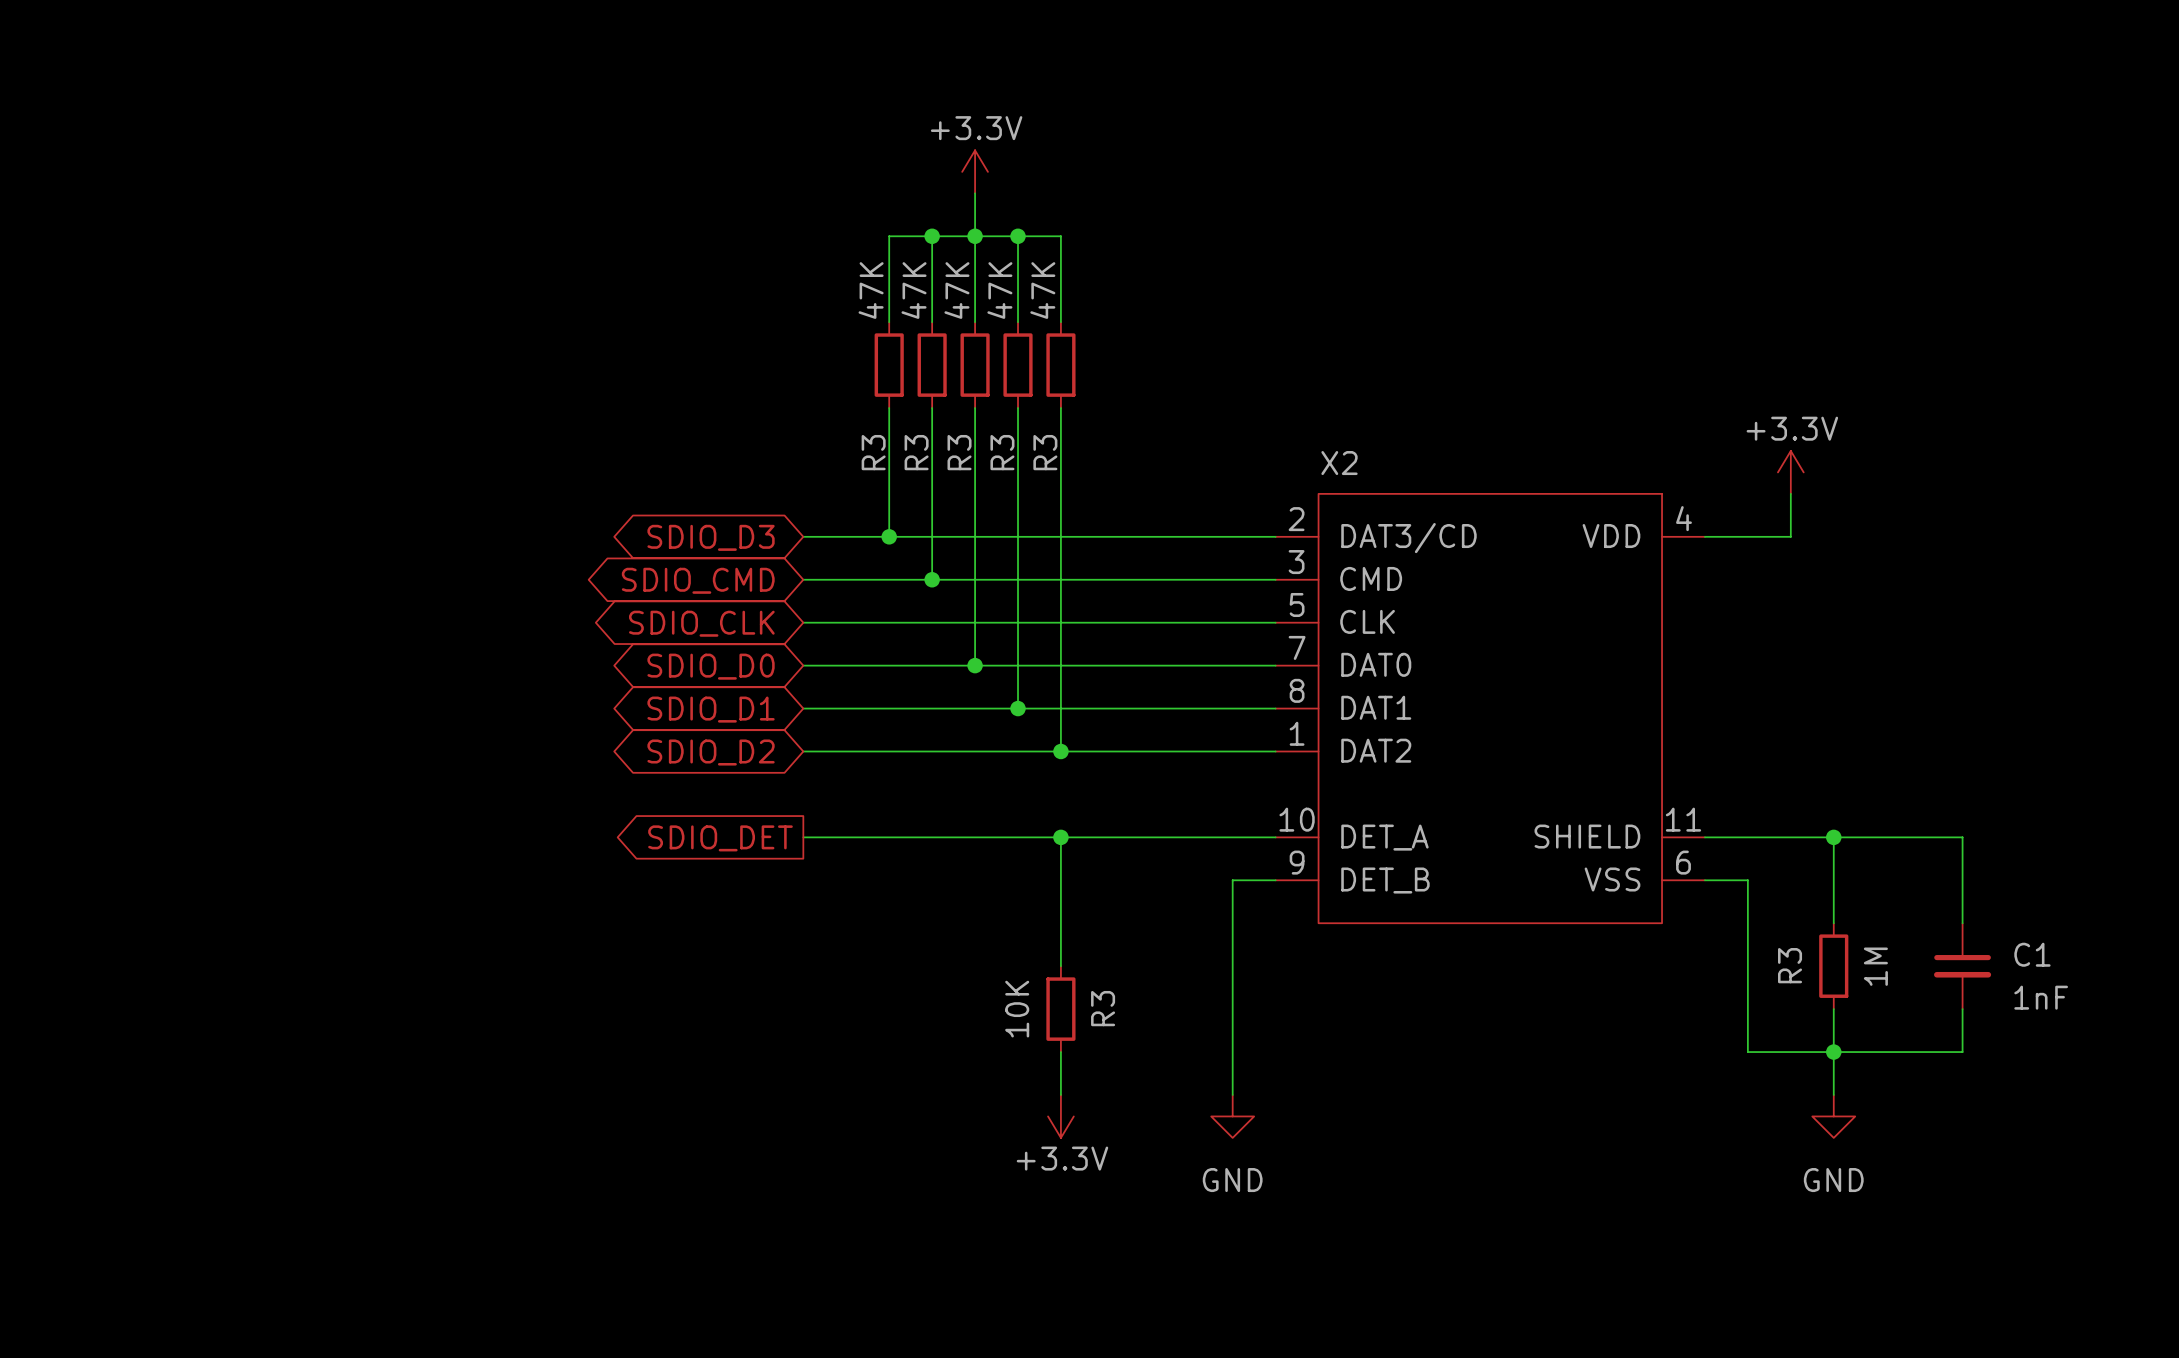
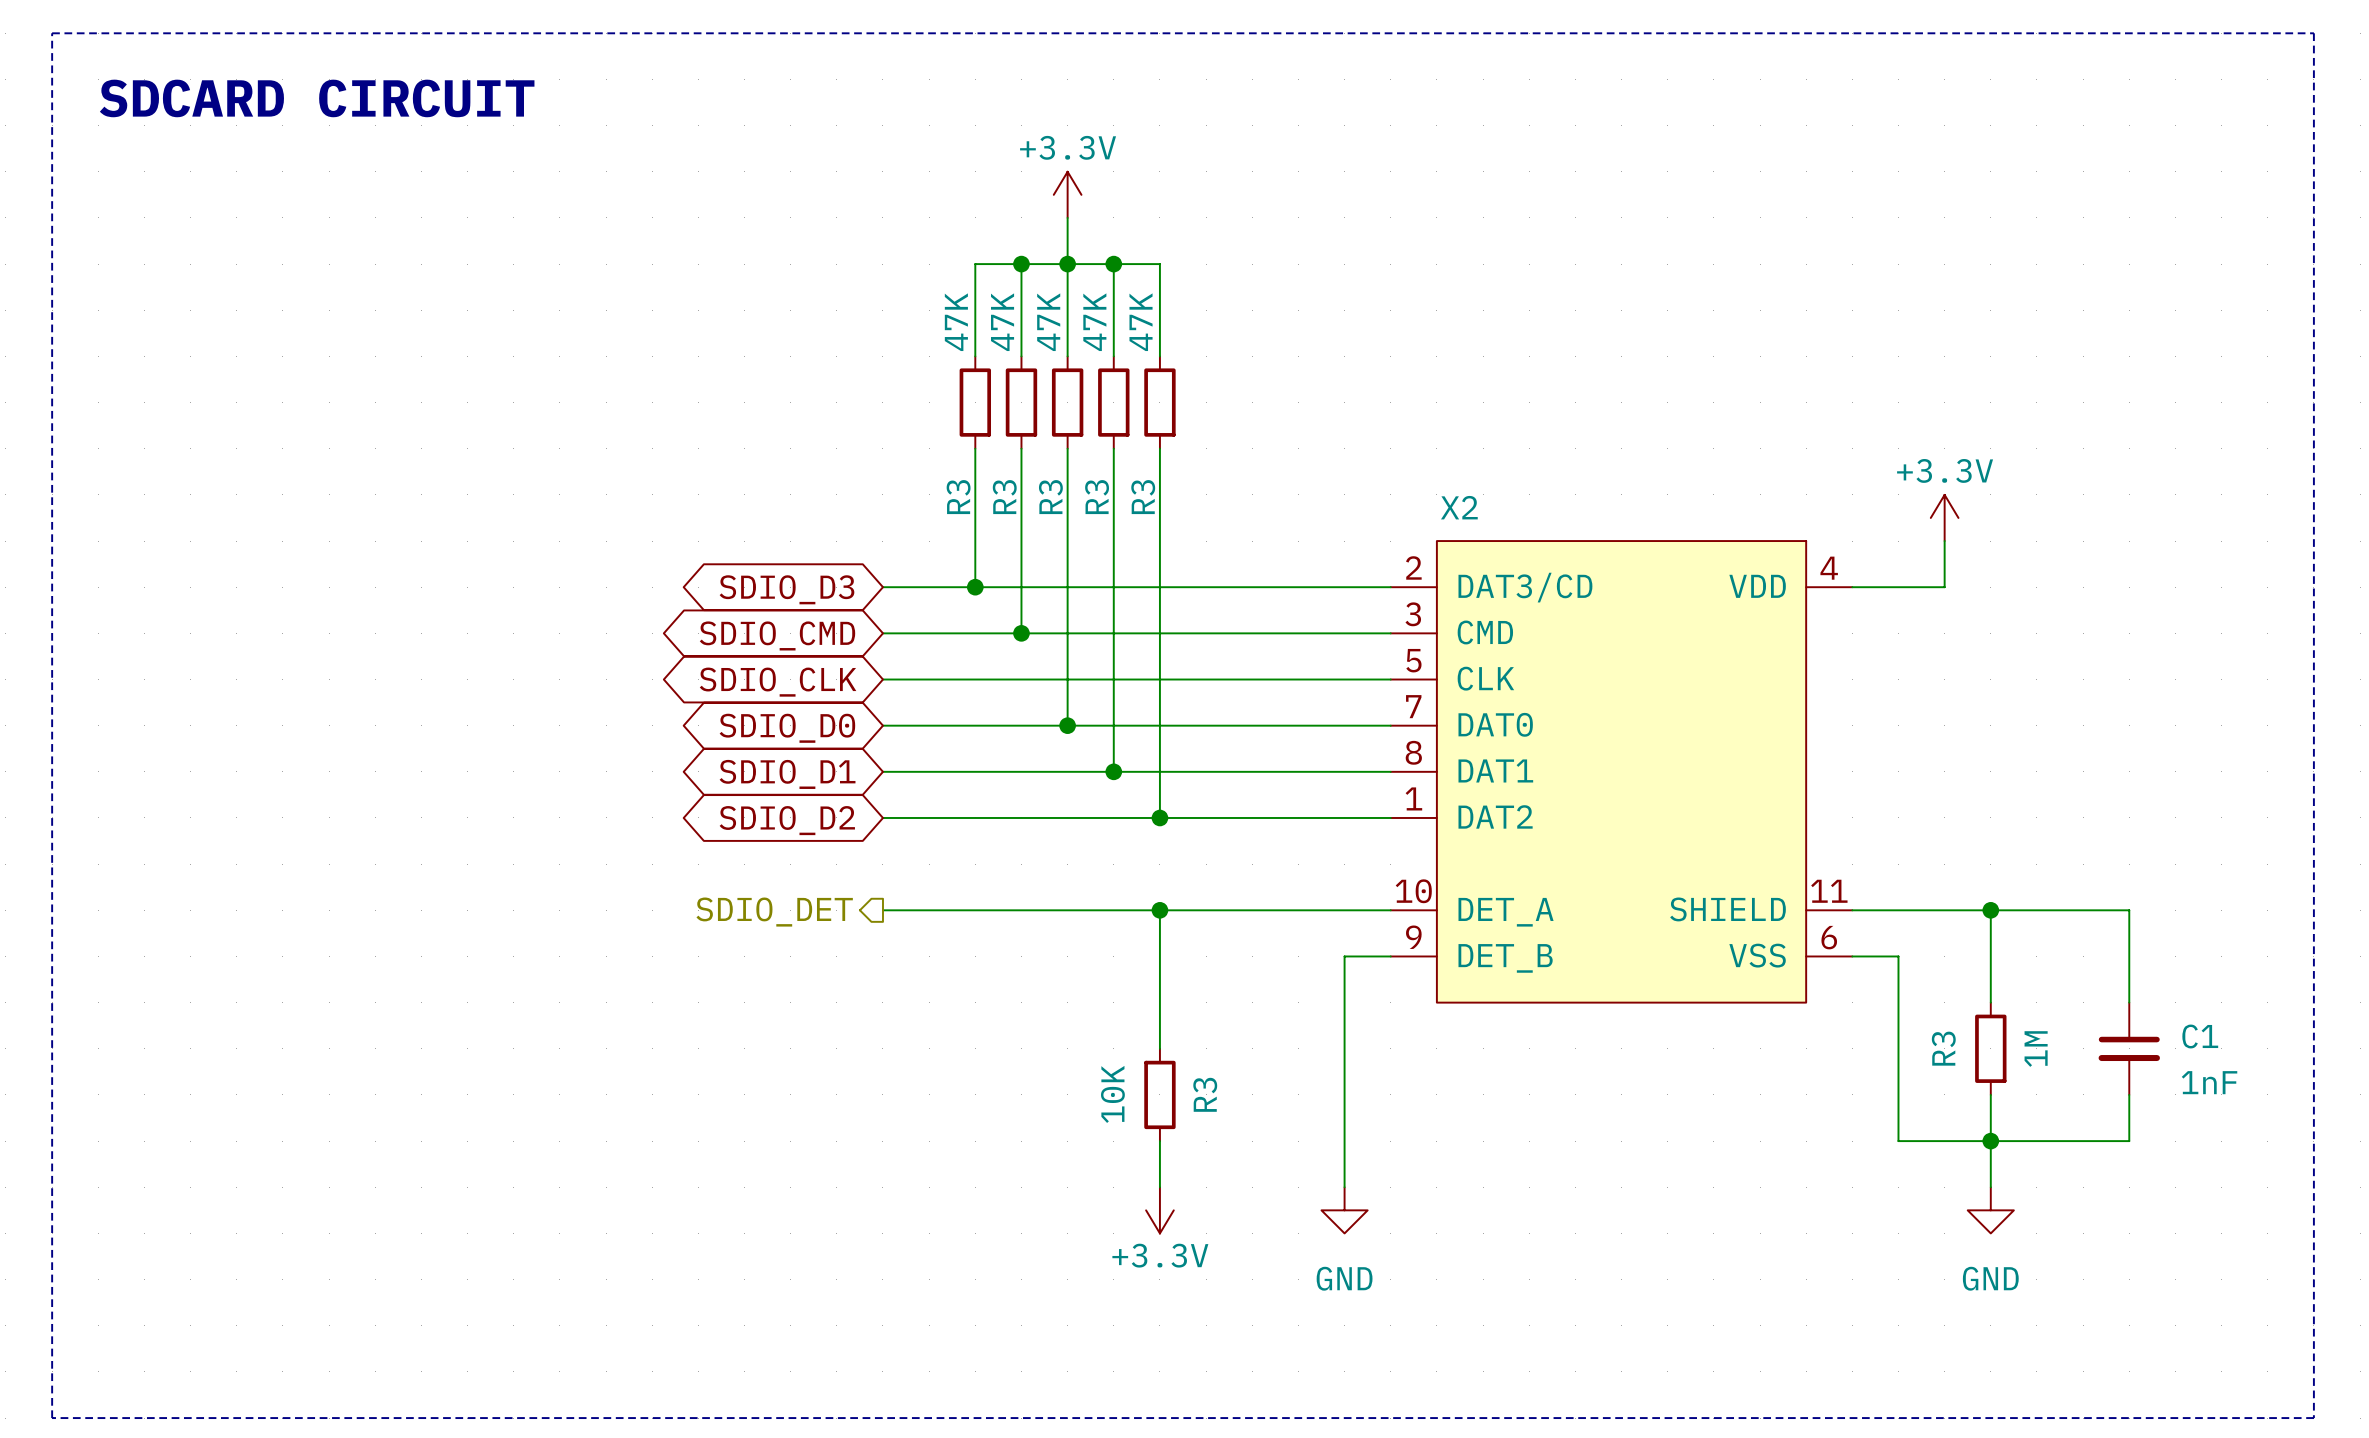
line: none -> (52, 33) (2313, 33) (2313, 1418) (52, 1418) (52, 33)
text: none -> SDCARD CIRCUIT (317, 98)
hierarchical label: none -> SDIO_DET (774, 912)
global label: SDIO_DET (720, 838) -> none

